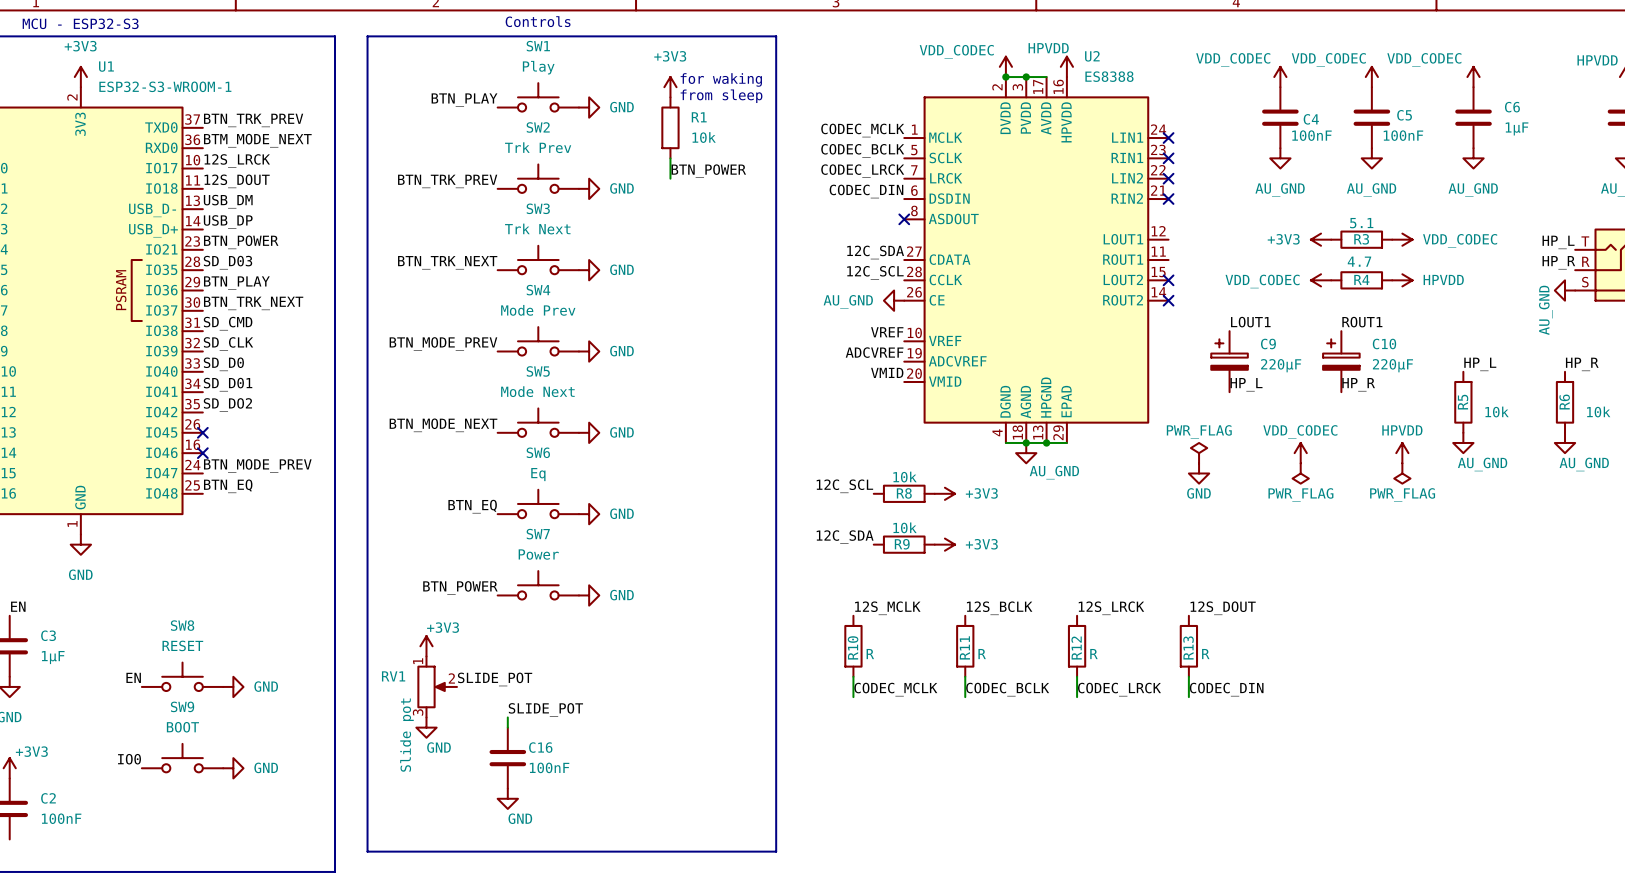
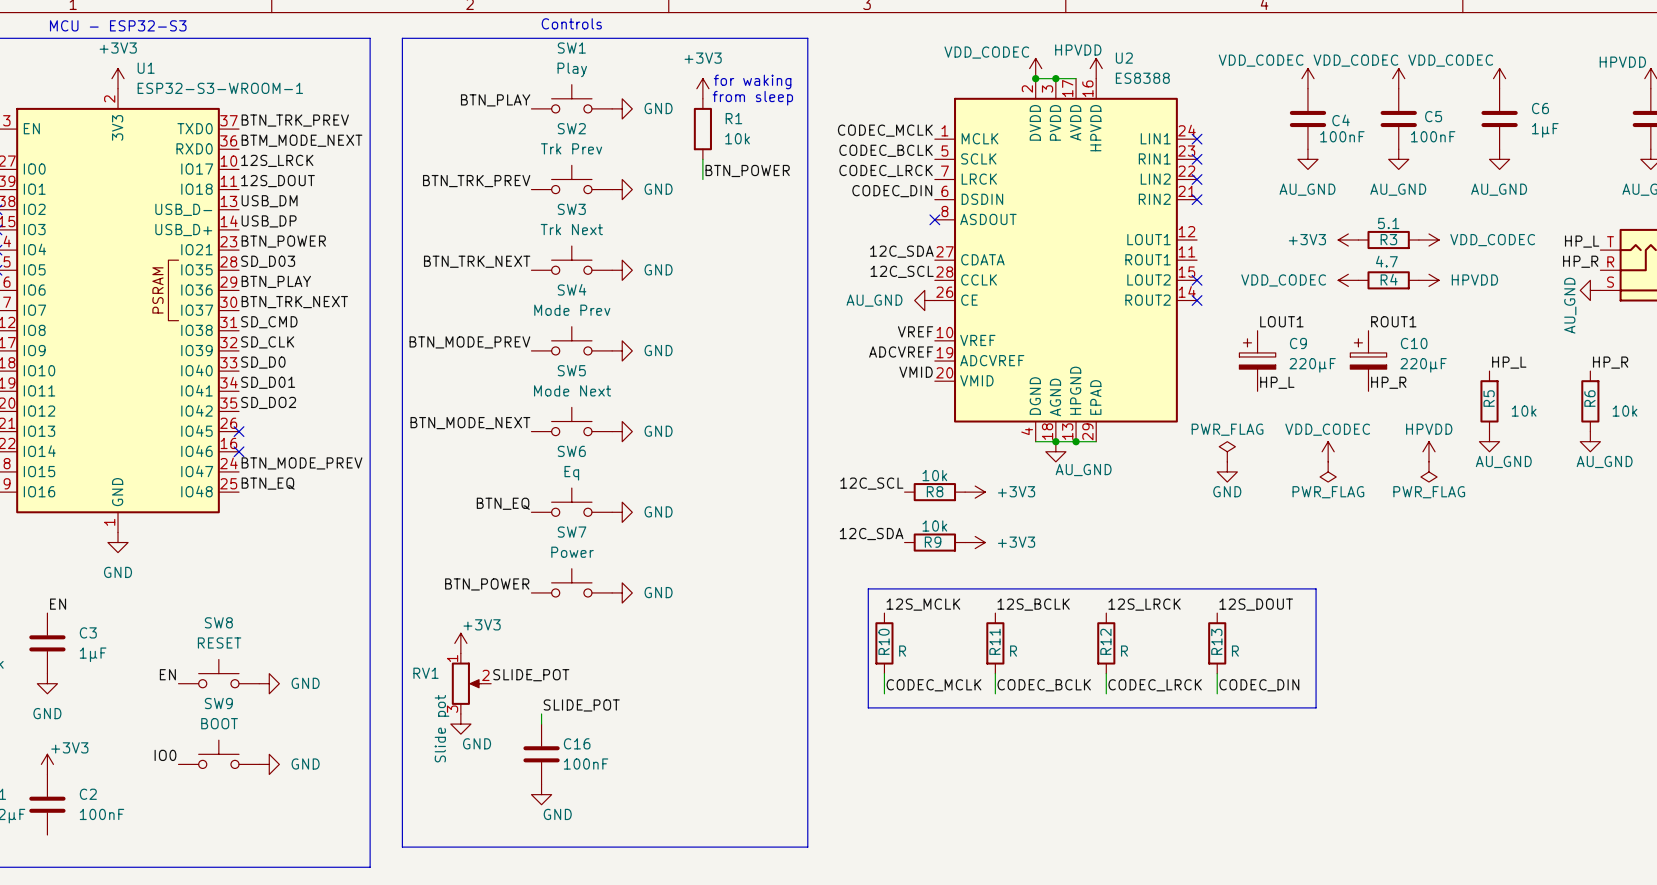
line: none -> (868, 588) (1316, 588) (1316, 707) (868, 707) (868, 588)

